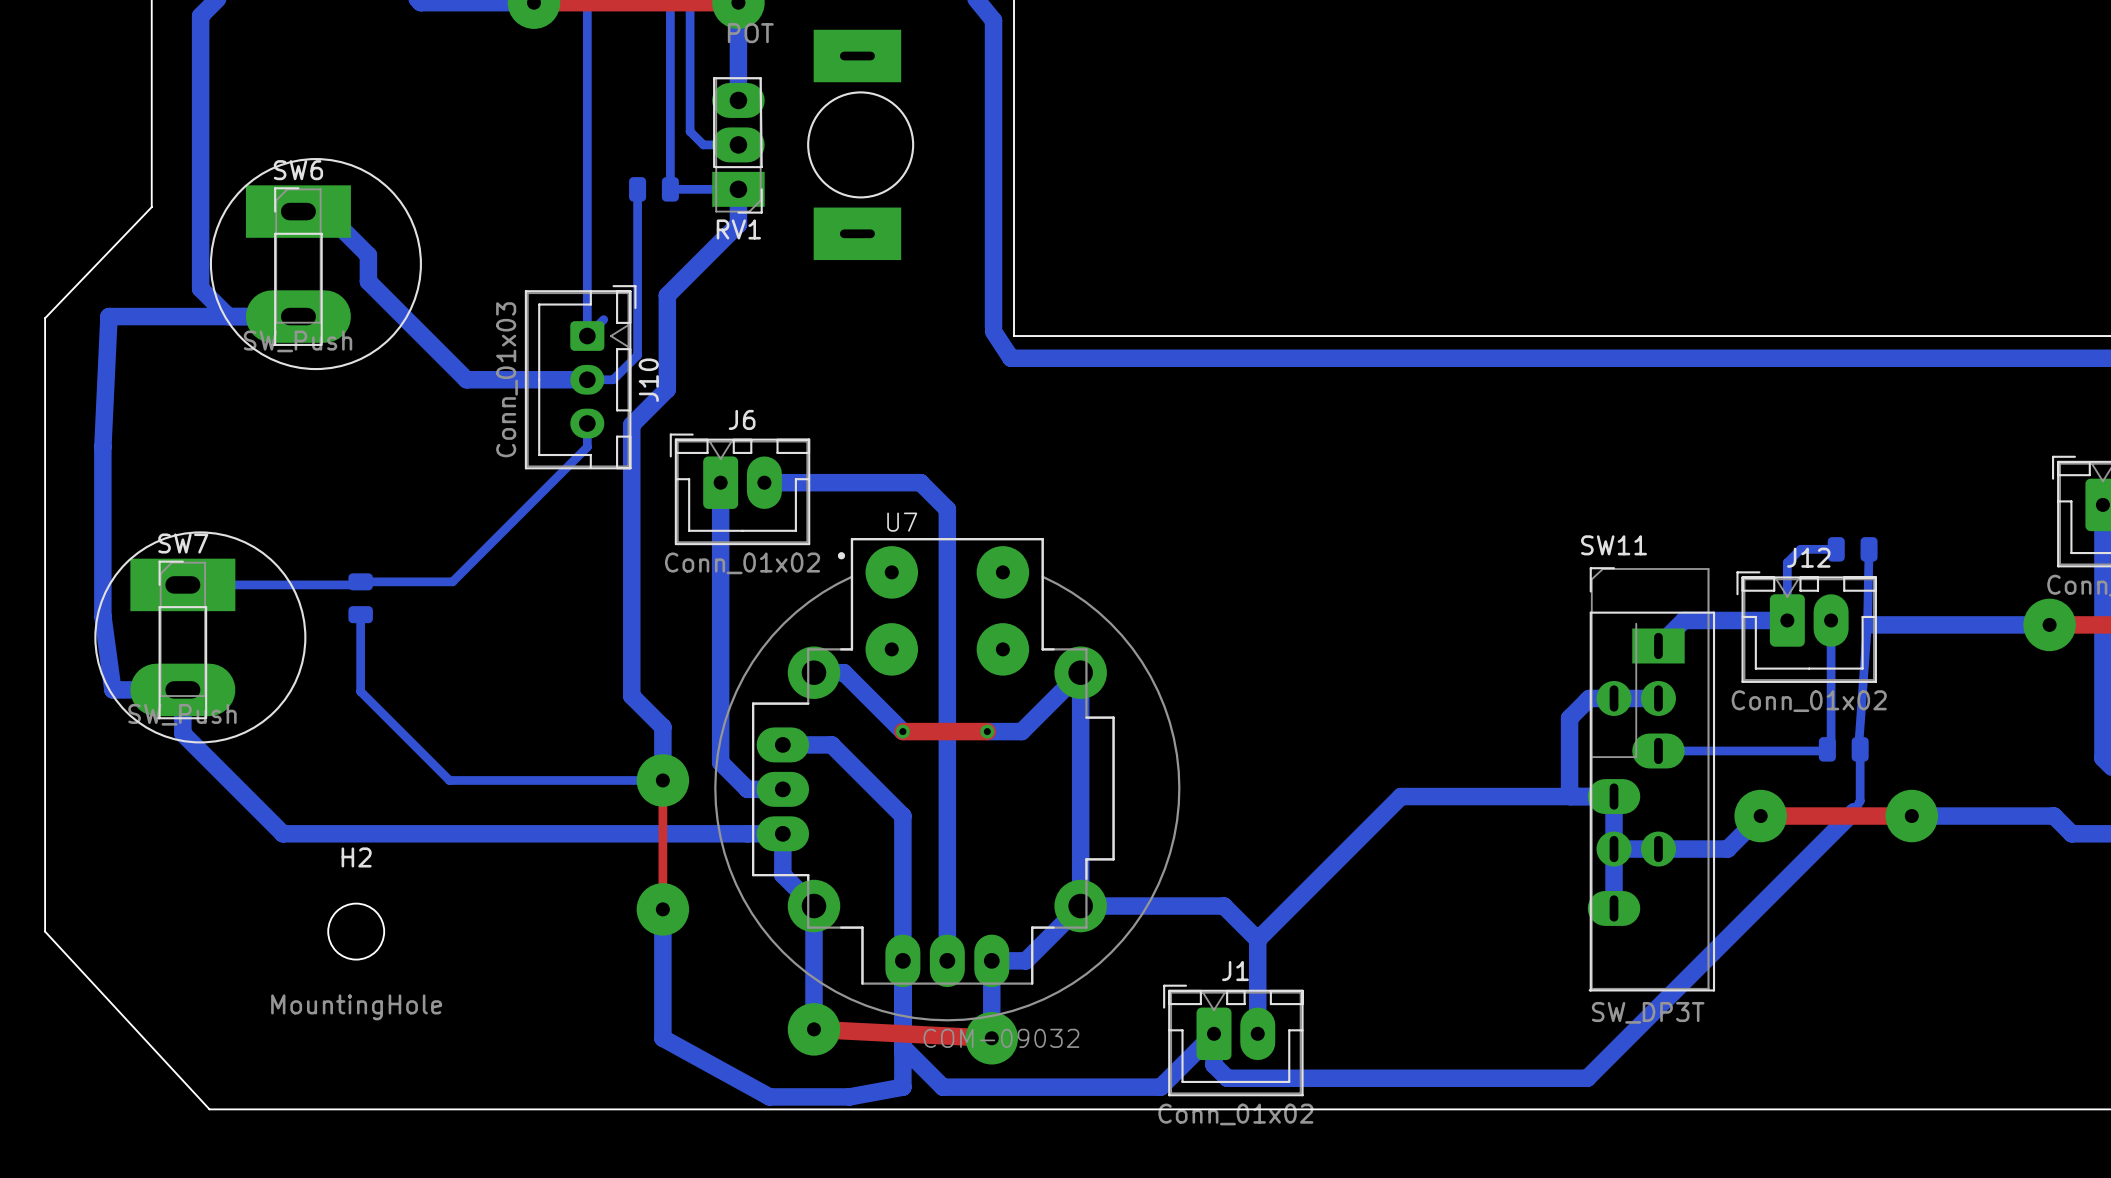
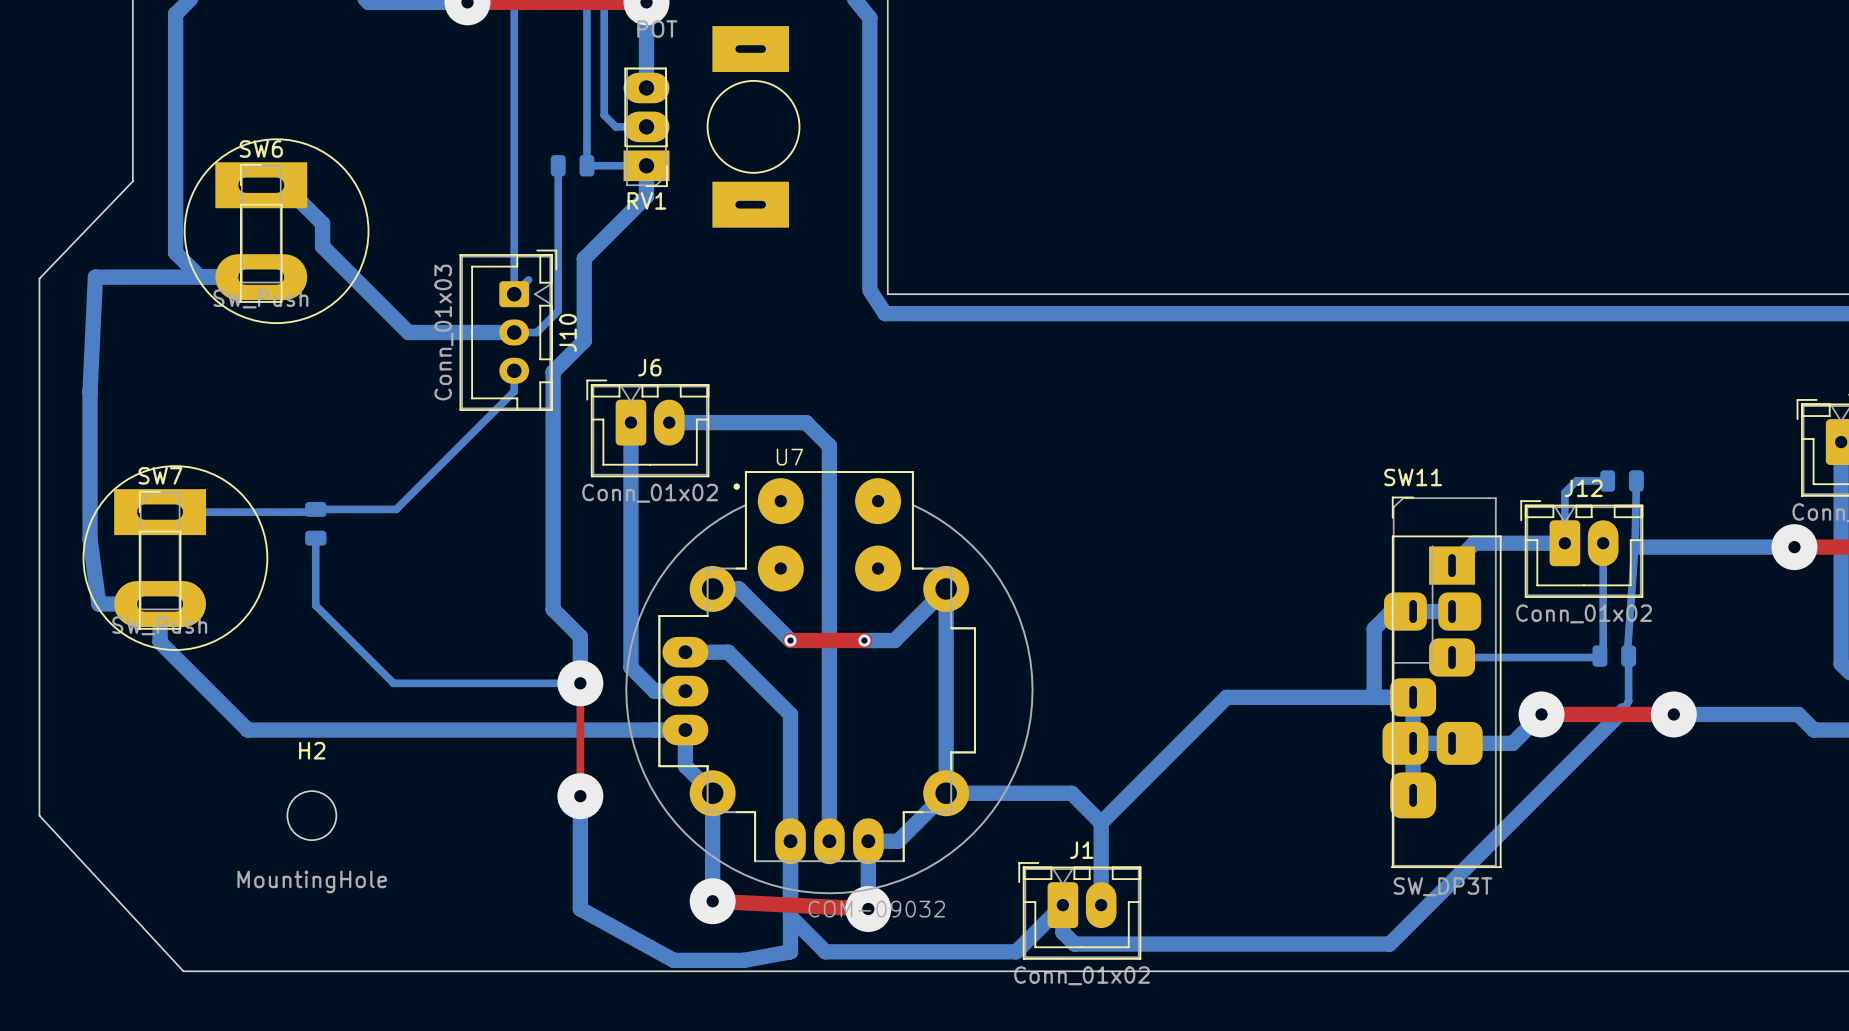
SW6 footprint: [209, 158, 422, 371] -> [183, 138, 370, 325]
SW7 footprint: [94, 531, 307, 744] -> [82, 465, 269, 651]
SW11 footprint: [1587, 567, 1716, 992] -> [1382, 496, 1502, 869]

